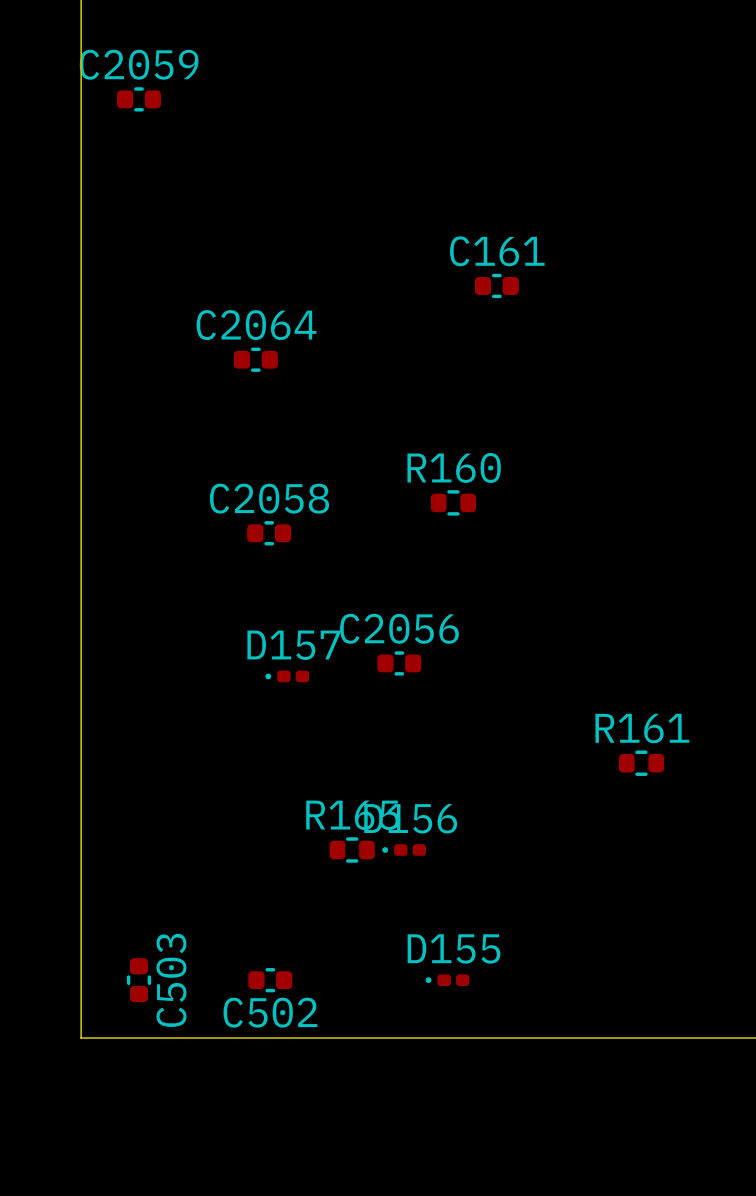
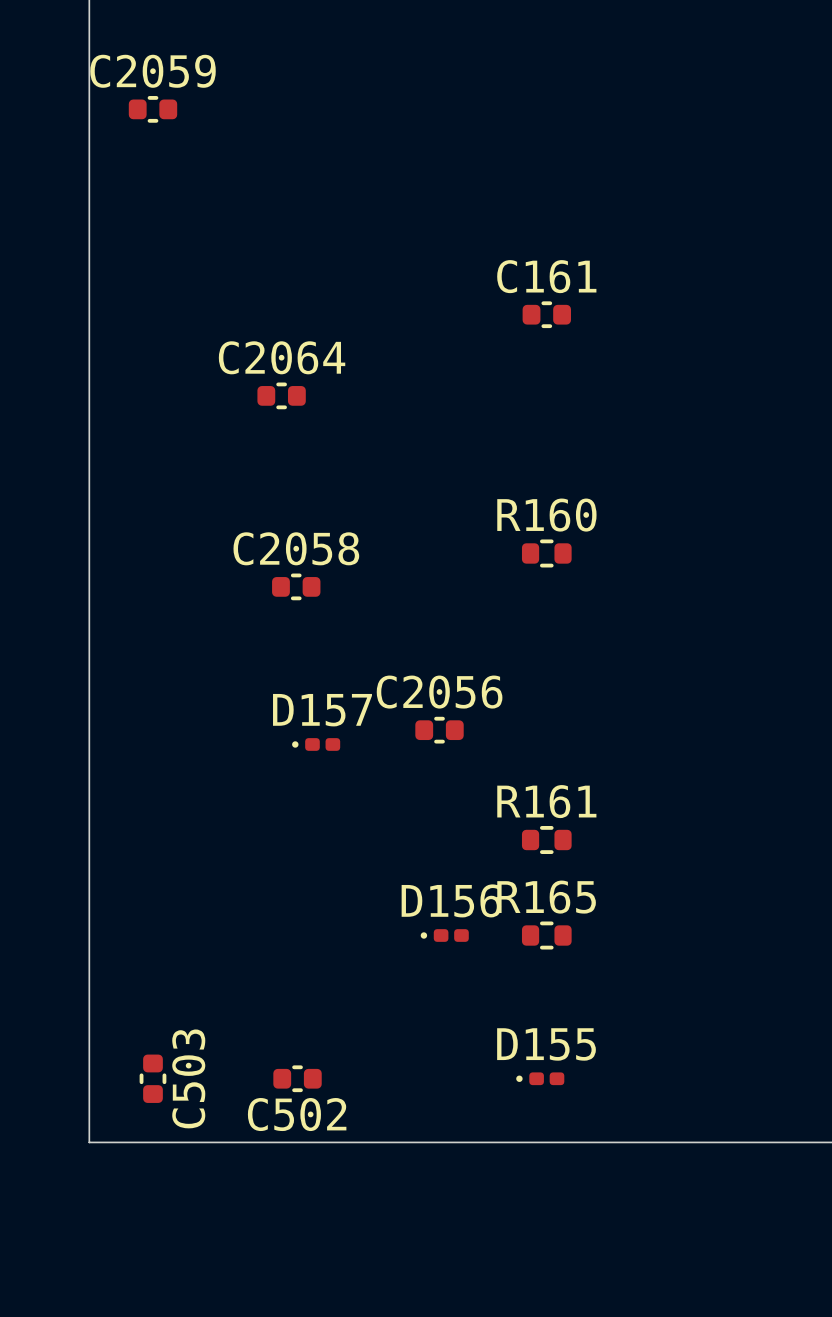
R160 position: (453, 502) -> (546, 553)
R161 position: (641, 763) -> (546, 839)
R165 position: (352, 850) -> (546, 935)
D155 position: (447, 980) -> (540, 1078)

